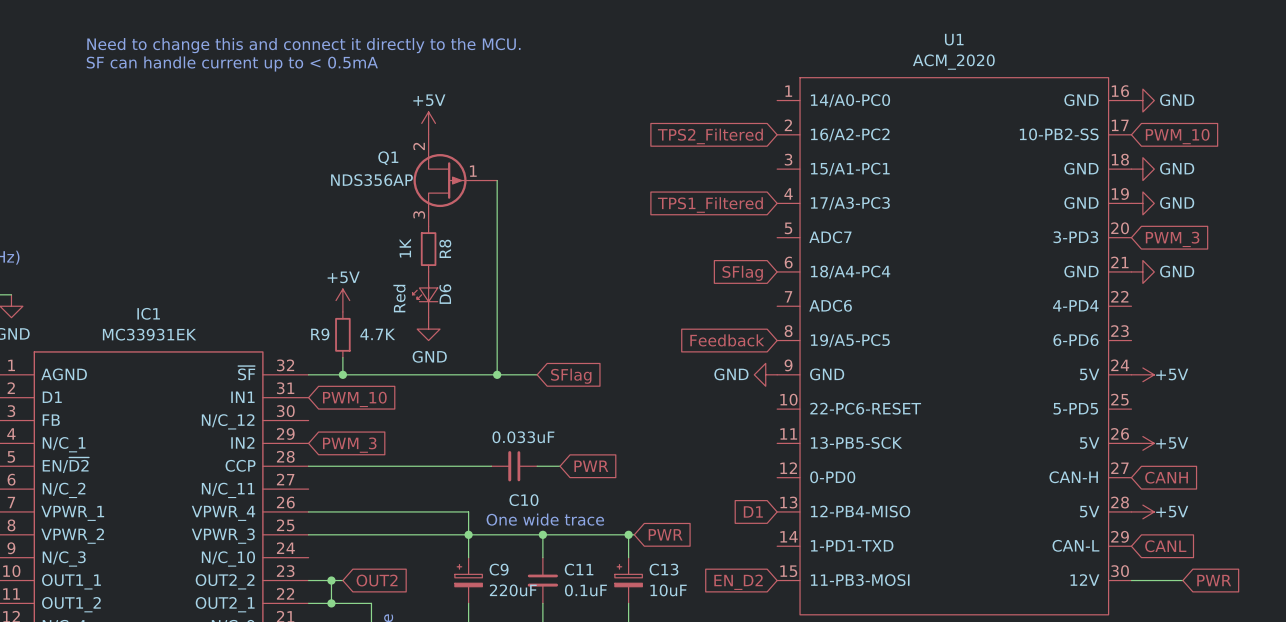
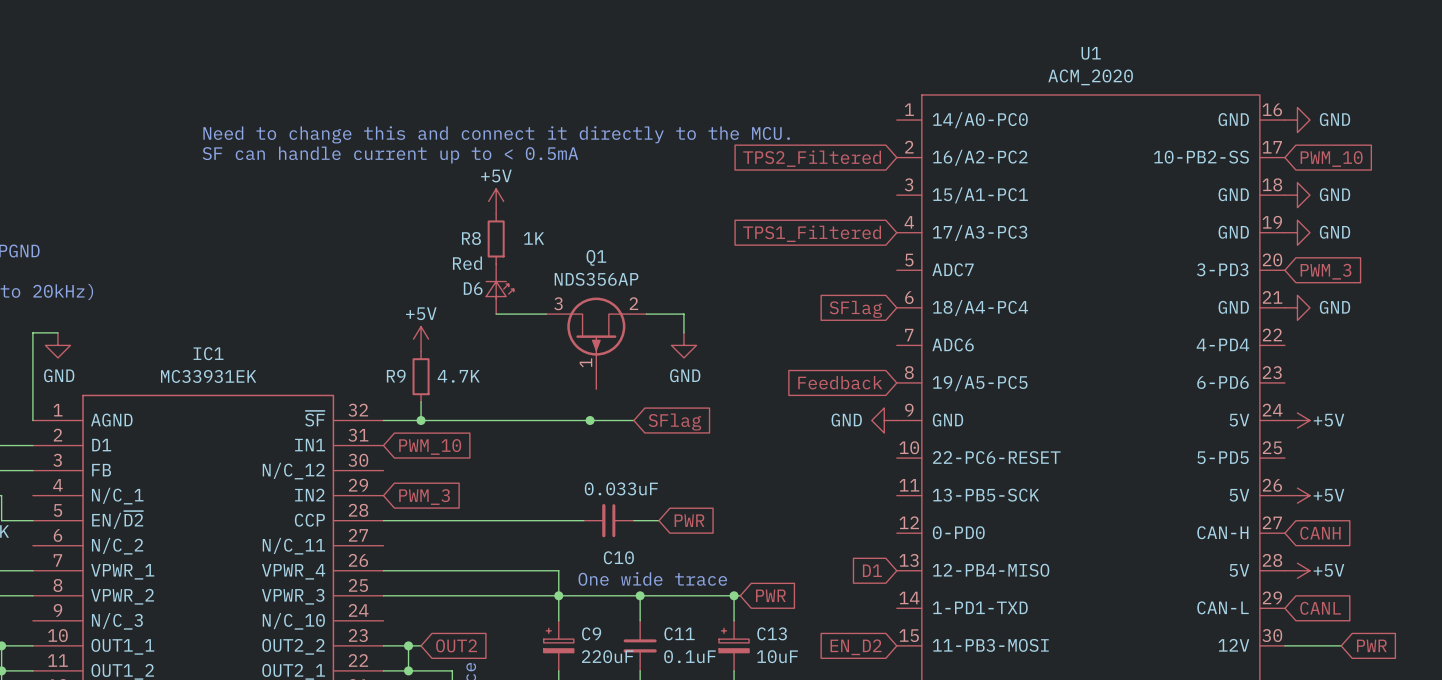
text position: Need to change this and connect it directly to the MCU. (303, 45) -> Need to change this and connect it directly to the MCU. (496, 134)
text position: SF can handle current up to < 0.5mA (232, 63) -> SF can handle current up to < 0.5mA (390, 155)
power symbol position: +5V (428, 123) -> +5V (496, 201)
Q1 name position: Q1 (388, 158) -> Q1 (596, 257)
Q1 value position: NDS356AP (371, 180) -> NDS356AP (596, 279)
Q1 rotation: 0° (440, 180) -> 90° clockwise (596, 326)
Q1 position: (455, 180) -> (596, 343)
wire: (497, 180) (497, 374) -> none
R8 value rotation: 0° (405, 248) -> 90° clockwise (534, 238)
R8 value position: 1K (405, 248) -> 1K (534, 238)
R8 name rotation: 0° (445, 248) -> 90° clockwise (471, 238)
R8 name position: R8 (445, 248) -> R8 (471, 238)
R8 position: (428, 249) -> (496, 238)
wire: none -> (496, 314) (546, 314)
wire: none -> (646, 314) (683, 314) (683, 332)
D6 rotation: 0° (425, 293) -> 180° (499, 290)
D6 position: (425, 294) -> (499, 289)
D6 value position: Red (399, 298) -> Red (467, 263)
power symbol position: GND (428, 329) -> GND (683, 345)

